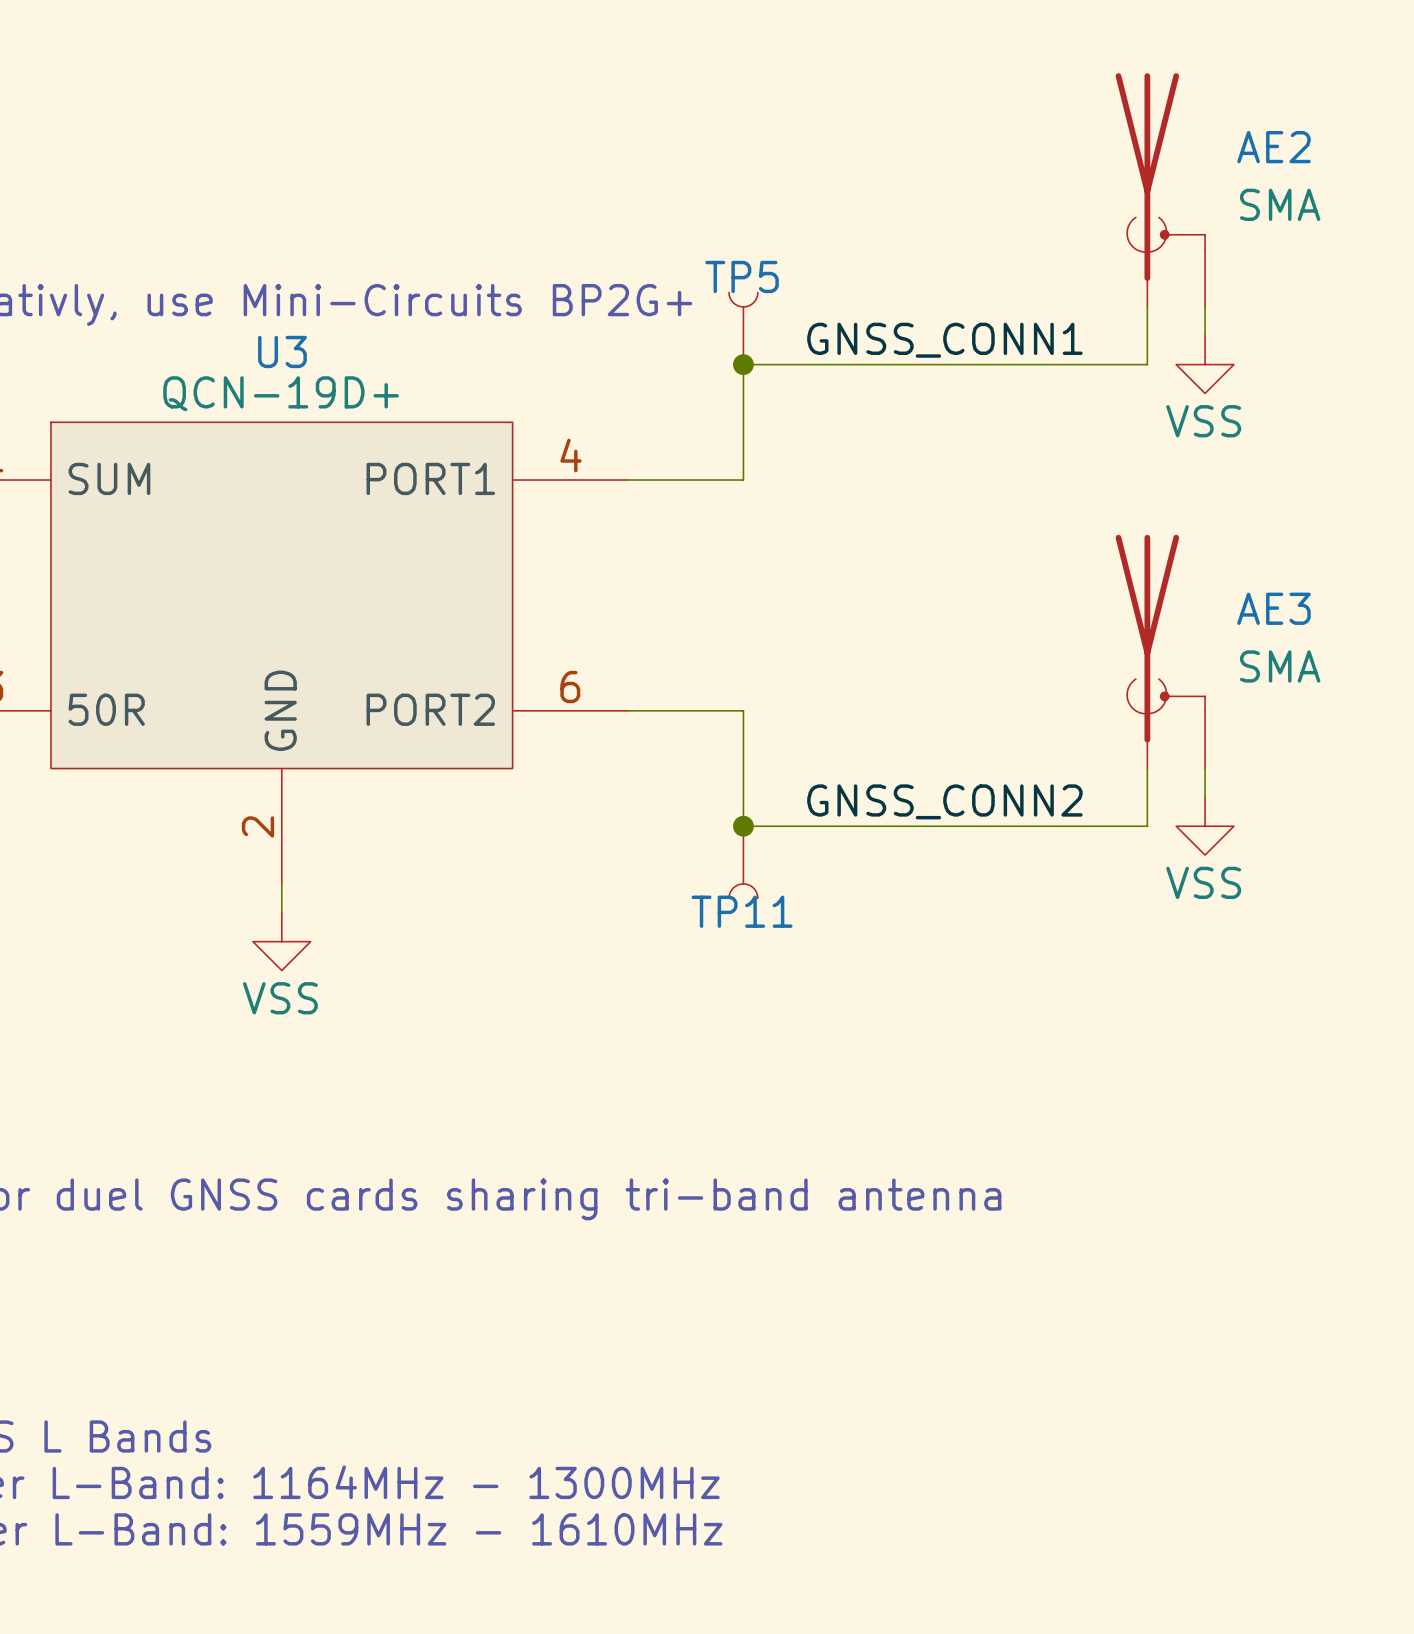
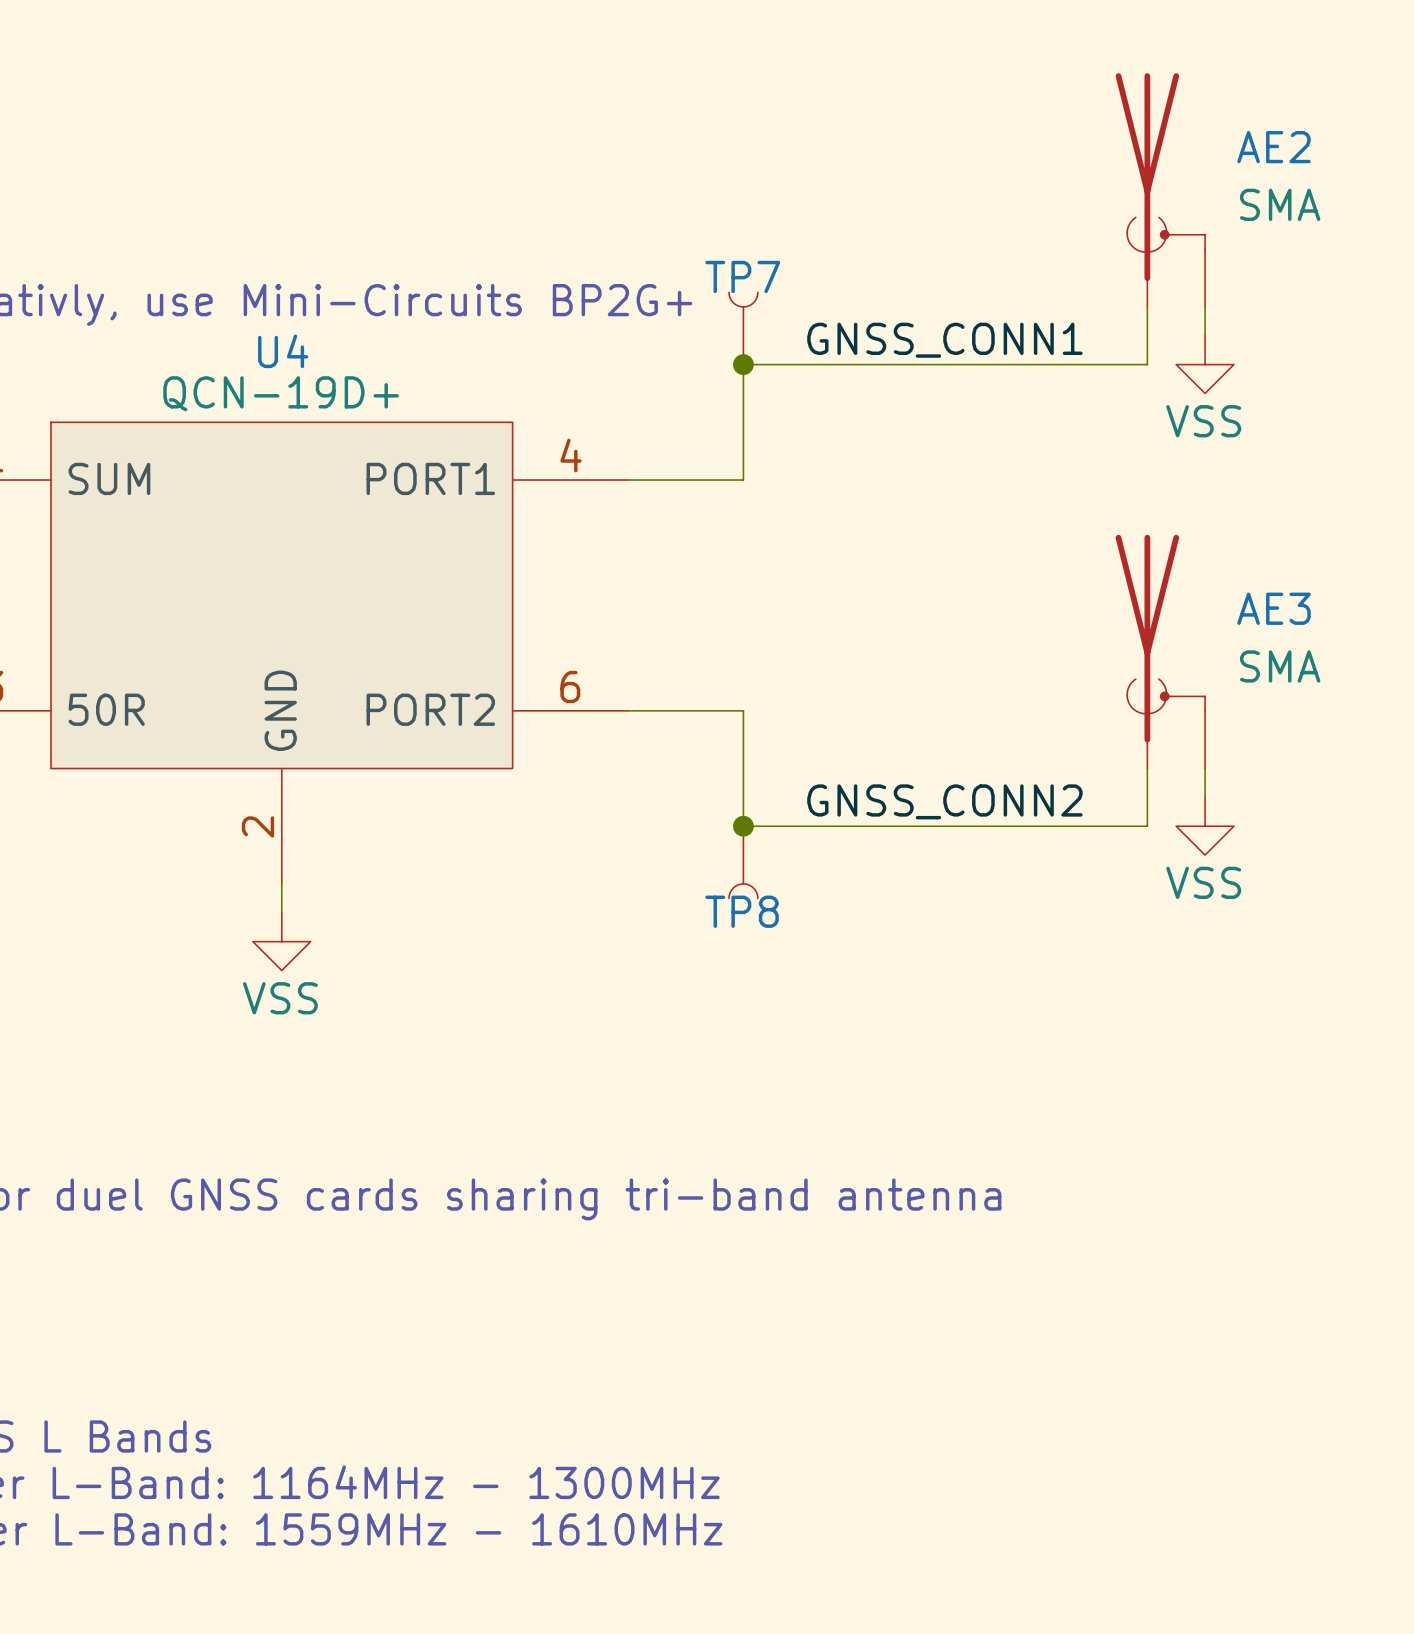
TP5 name: TP5 (742, 276) -> TP7 (742, 276)
U3 name: U3 (282, 351) -> U4 (283, 351)
TP11 name: TP11 (742, 911) -> TP8 (742, 911)

